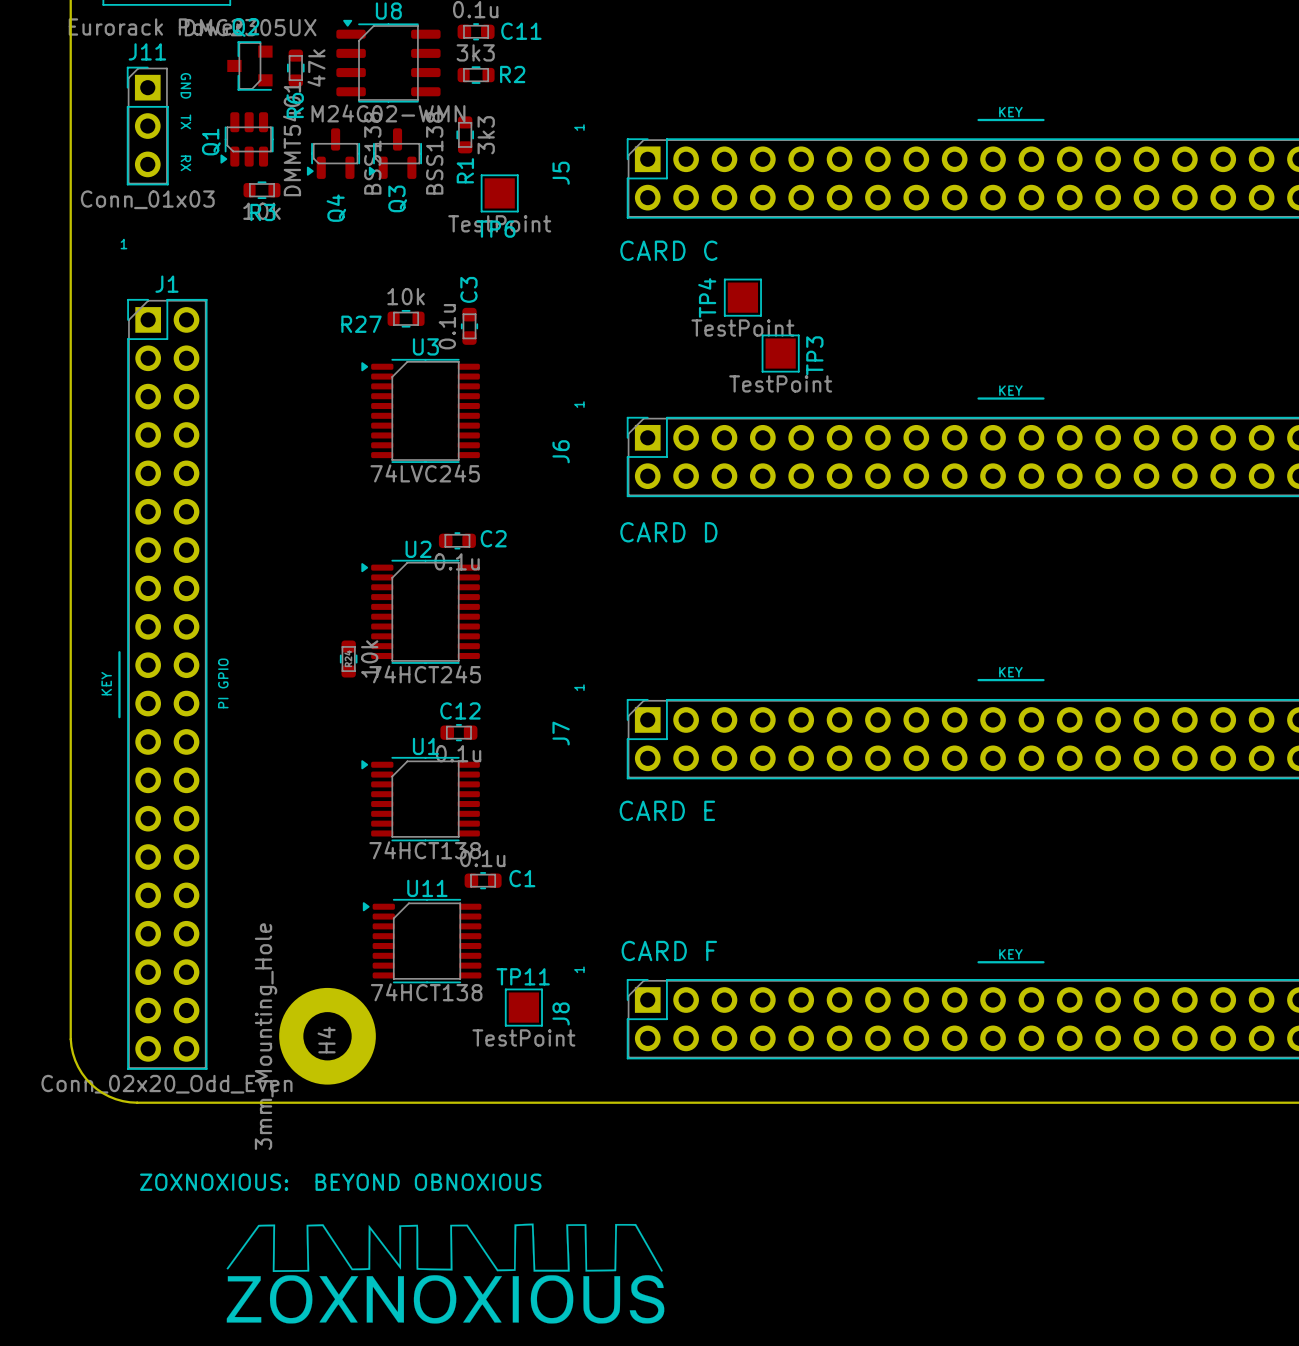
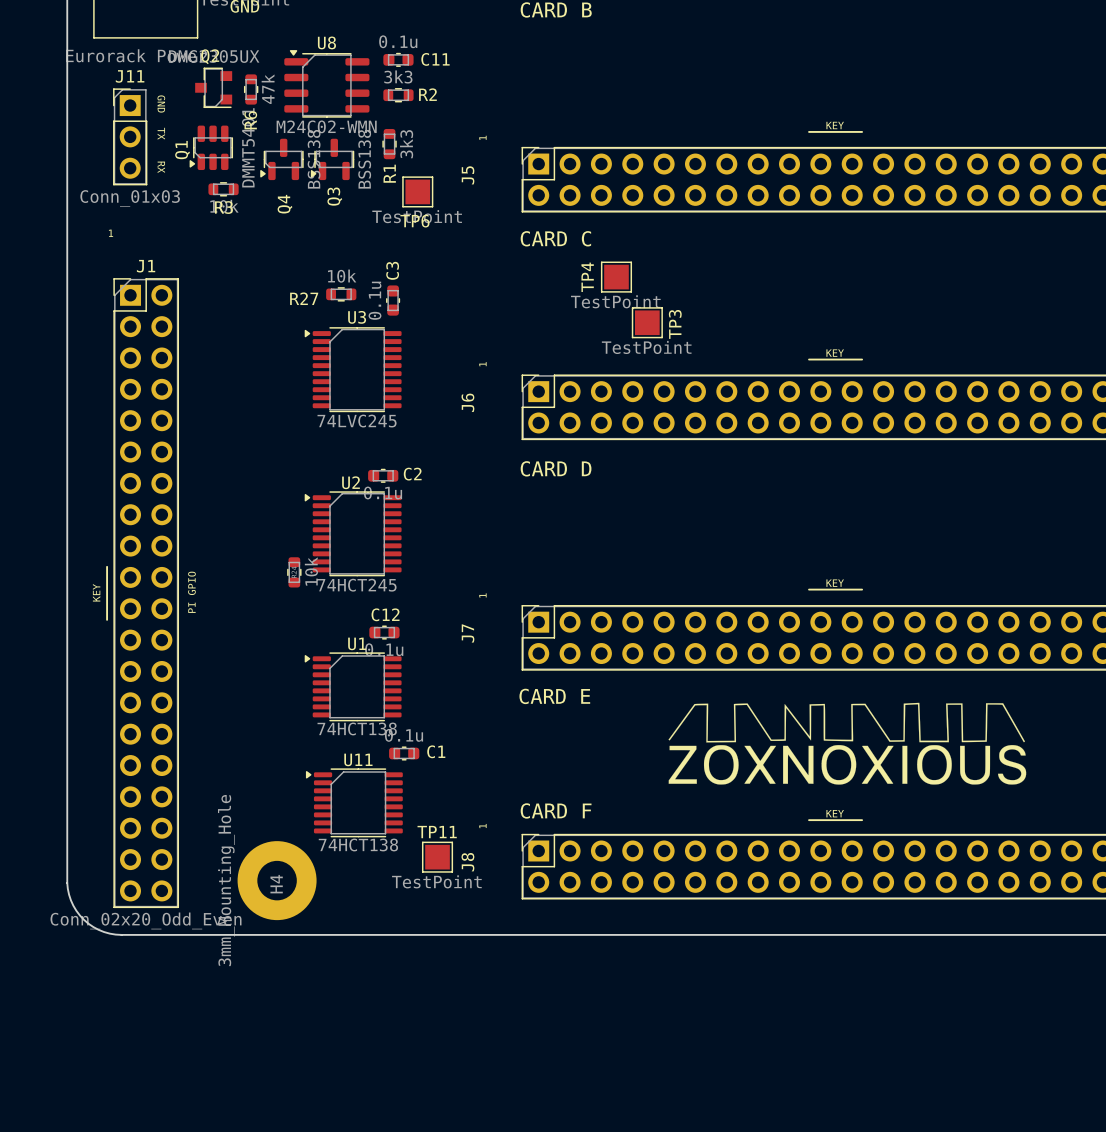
drawing: none -> [668, 702, 1027, 785]
text: ZOXNOXIOUS: BEYOND OBNOXIOUS (340, 1182) -> none
drawing: [226, 1223, 665, 1324] -> none

